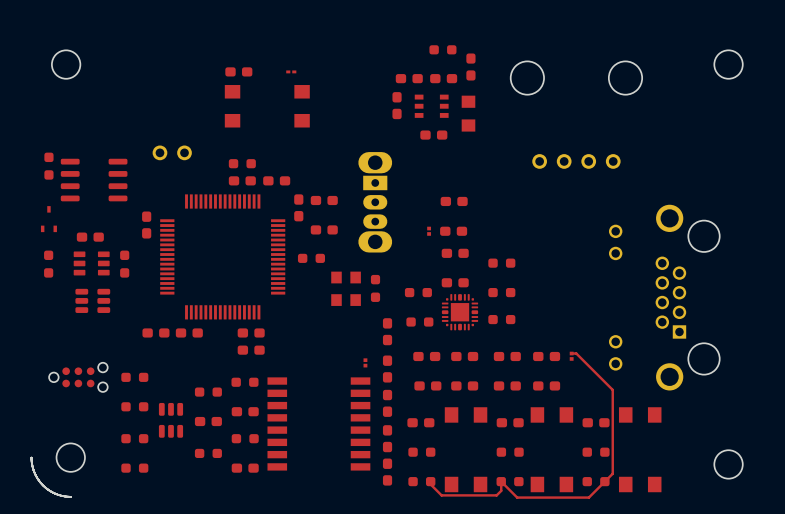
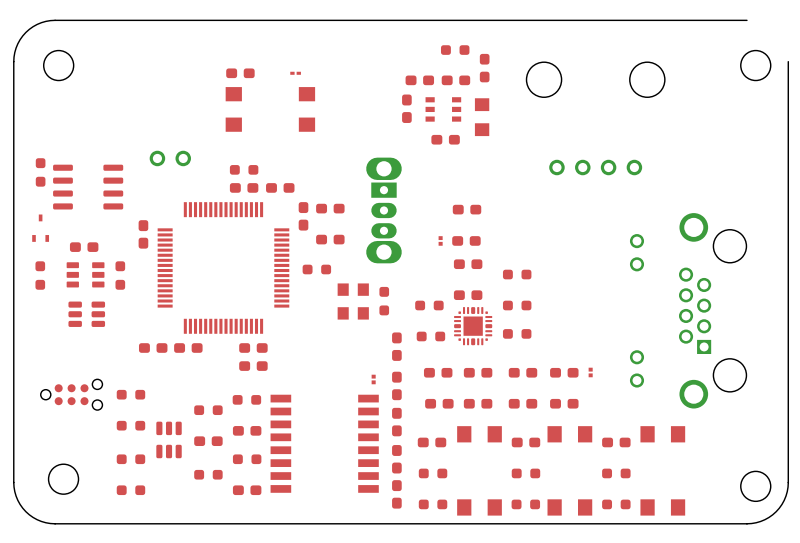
board edge: none -> (746, 20) (55, 20) (45, 21) (33, 26) (20, 39) (16, 48) (13, 61) (13, 482) (16, 496) (20, 504) (29, 514) (37, 519) (55, 523) (746, 523) (760, 521) (768, 517) (781, 504) (785, 496) (788, 482) (788, 61)
top track: (571, 353) (576, 353) (612, 389) (612, 473) (588, 497) (517, 497) (501, 481) (501, 490) (496, 495) (441, 495) (430, 484) -> none
board edge: (31, 457) (33, 470) (42, 485) (57, 494) (70, 496) -> none
board edge: (31, 457) (33, 470) (42, 485) (57, 494) (70, 496) -> none
board edge: (31, 457) (33, 470) (42, 485) (57, 494) (70, 496) -> none
board edge: (31, 457) (33, 470) (42, 485) (57, 494) (70, 496) -> none

